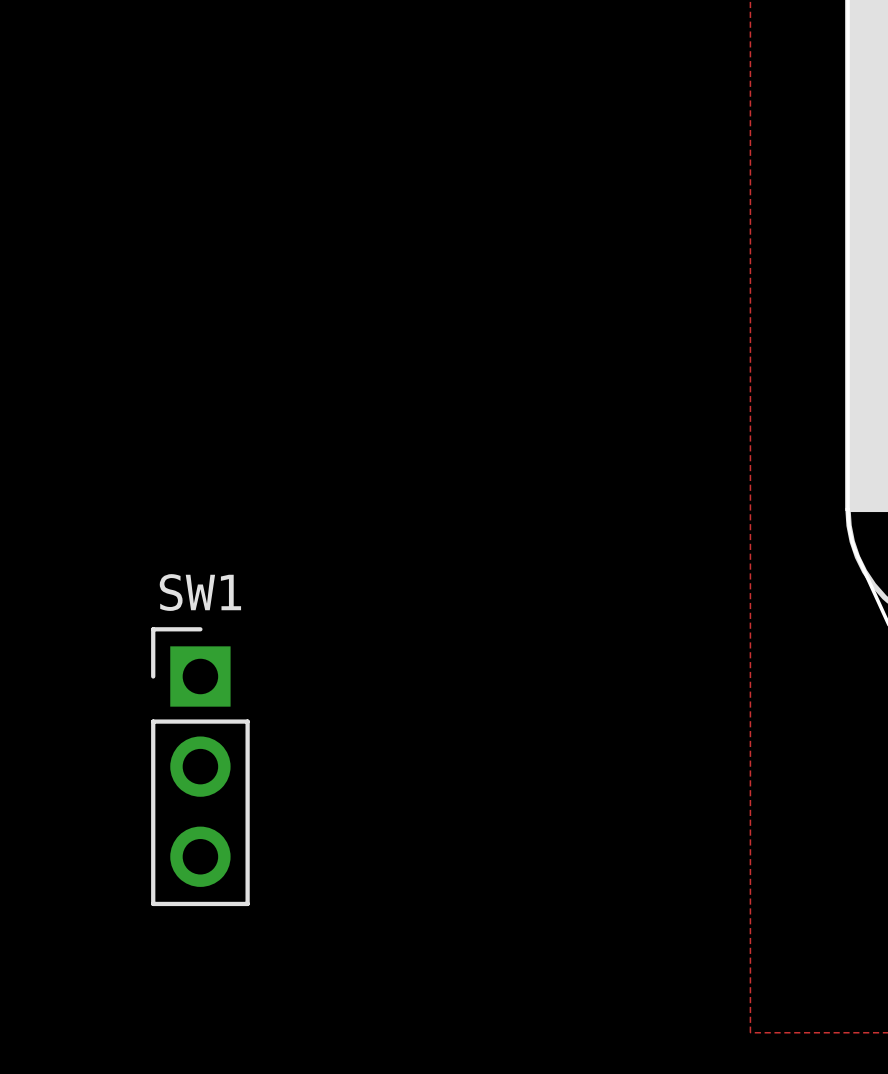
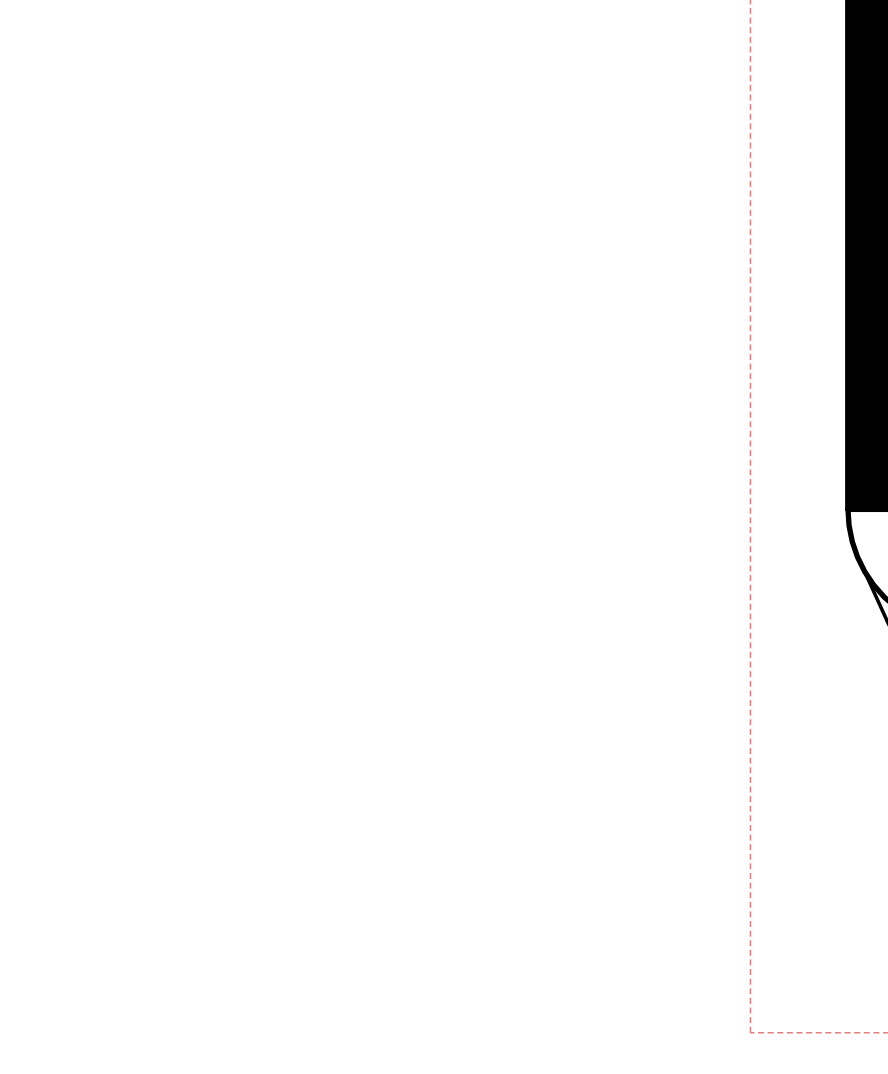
SW1: (200, 766) -> none

